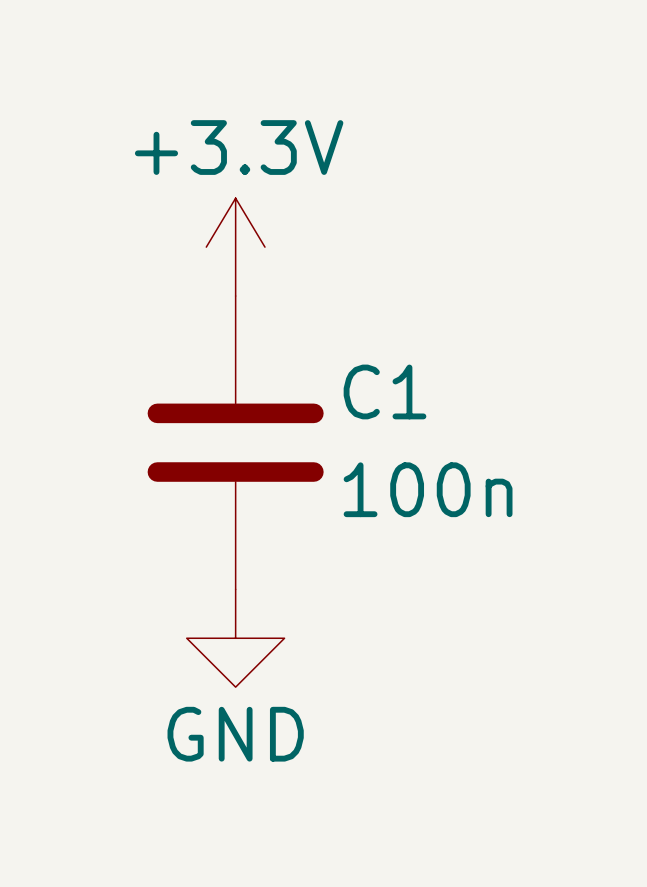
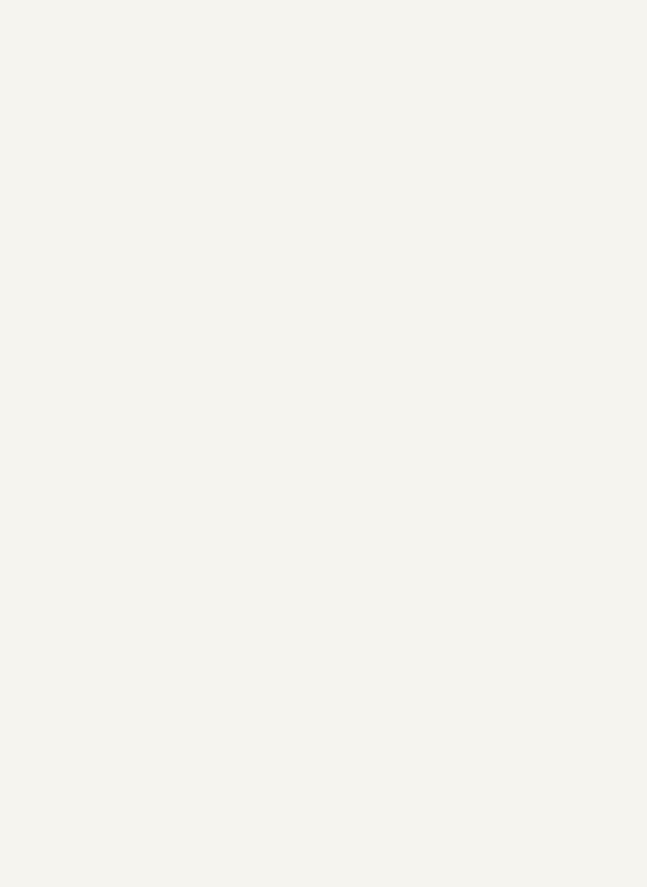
power symbol: +3.3V (235, 247) -> none
C1: 100n (235, 442) -> none
power symbol: GND (235, 638) -> none

